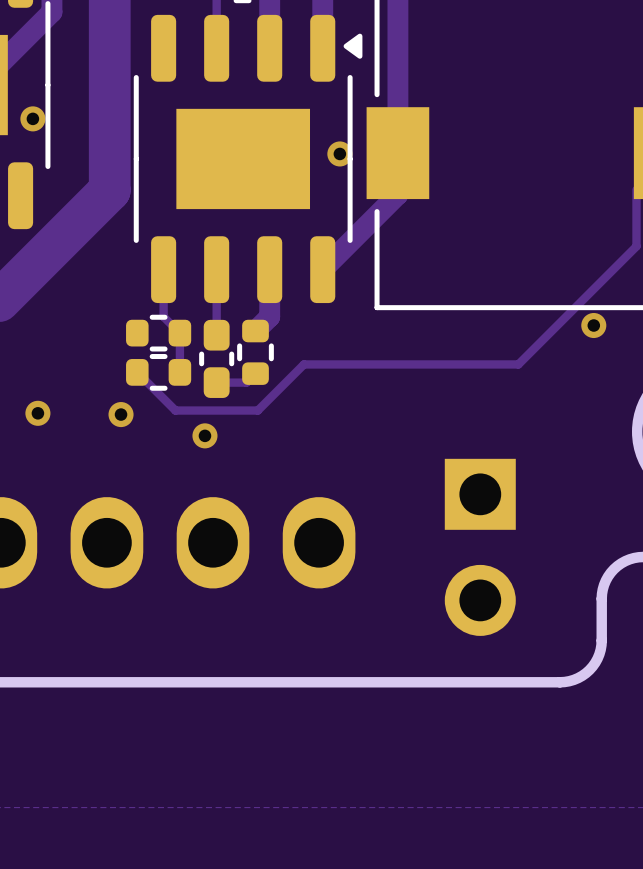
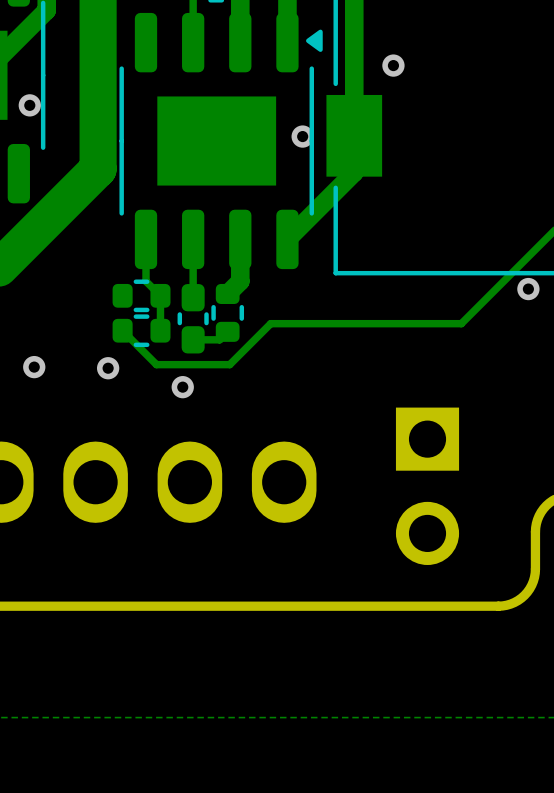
via: none -> (393, 65)

